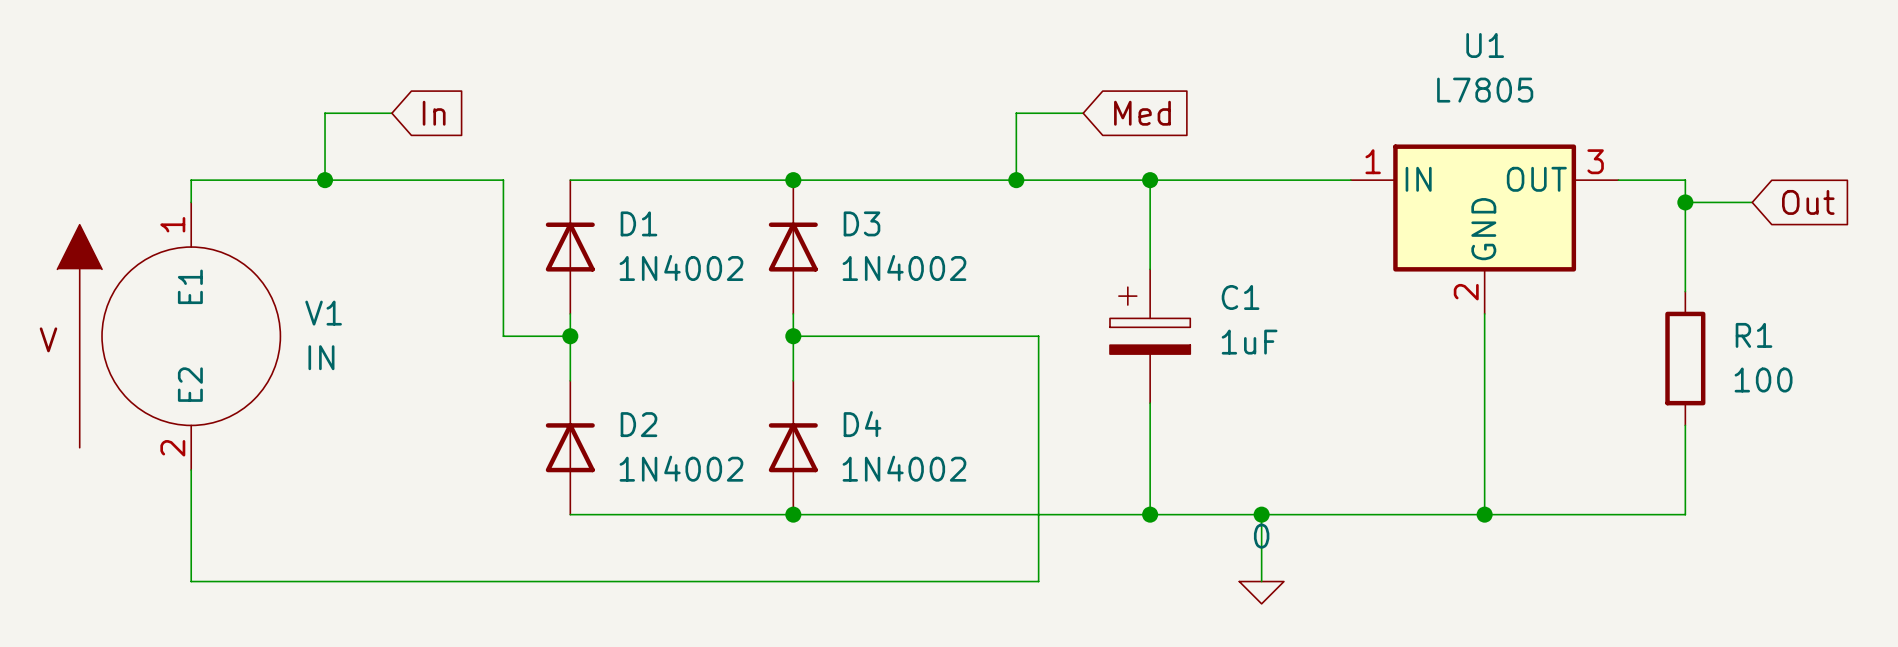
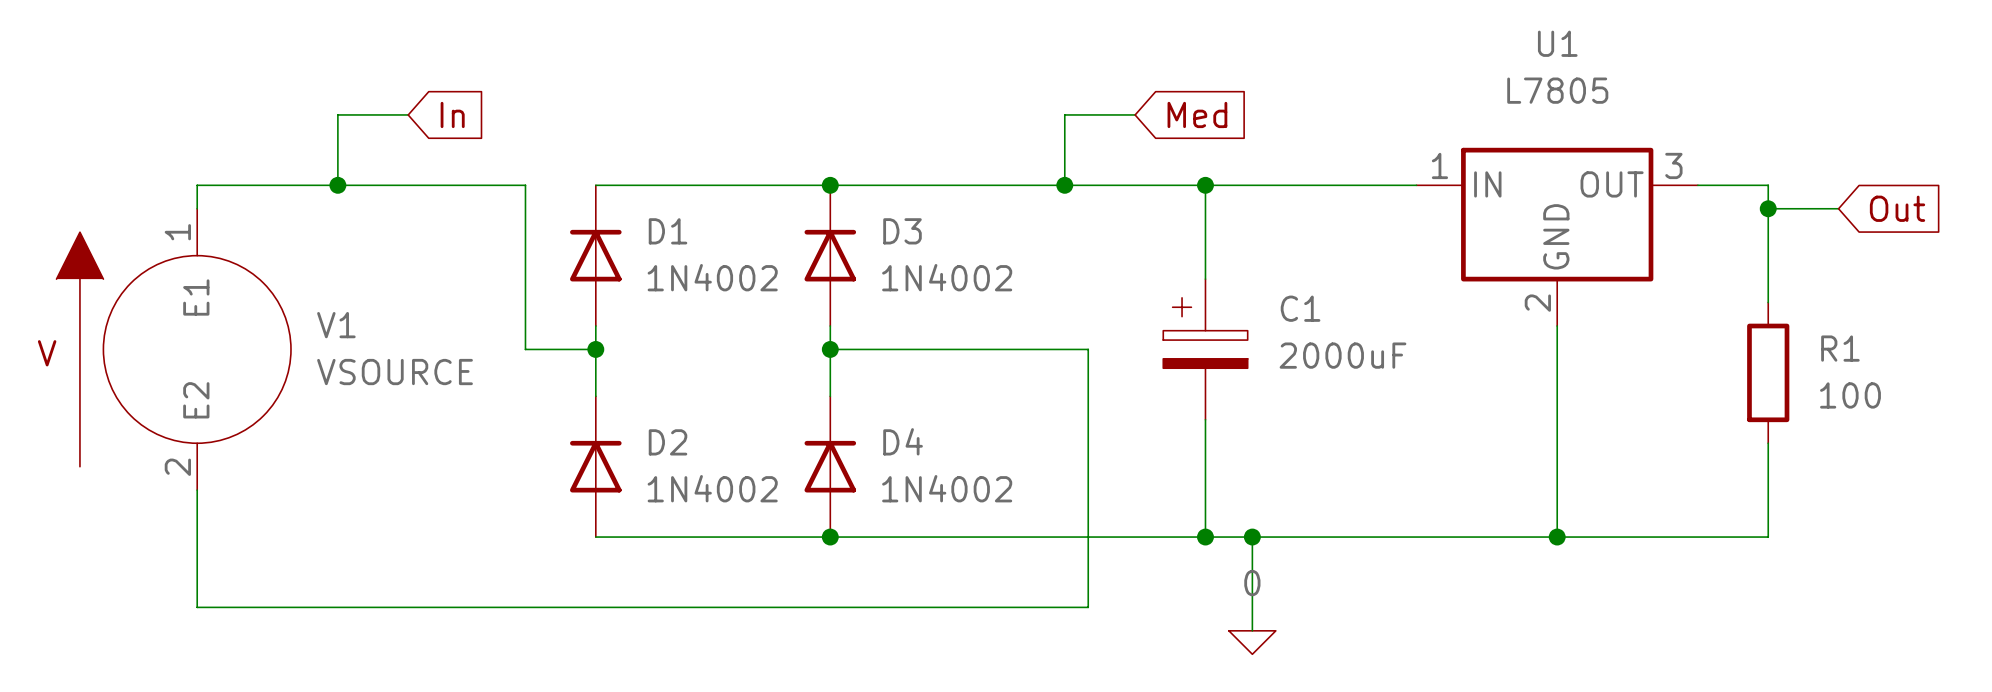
C1 value: 1uF (1249, 342) -> 2000uF (1342, 355)
V1 value: IN (321, 357) -> VSOURCE (395, 372)
wire: none -> (1252, 537) (1252, 630)
wire: (1261, 514) (1261, 581) -> none
junction position: (1261, 514) -> (1252, 537)
power symbol position: 0 (1261, 592) -> 0 (1252, 642)

